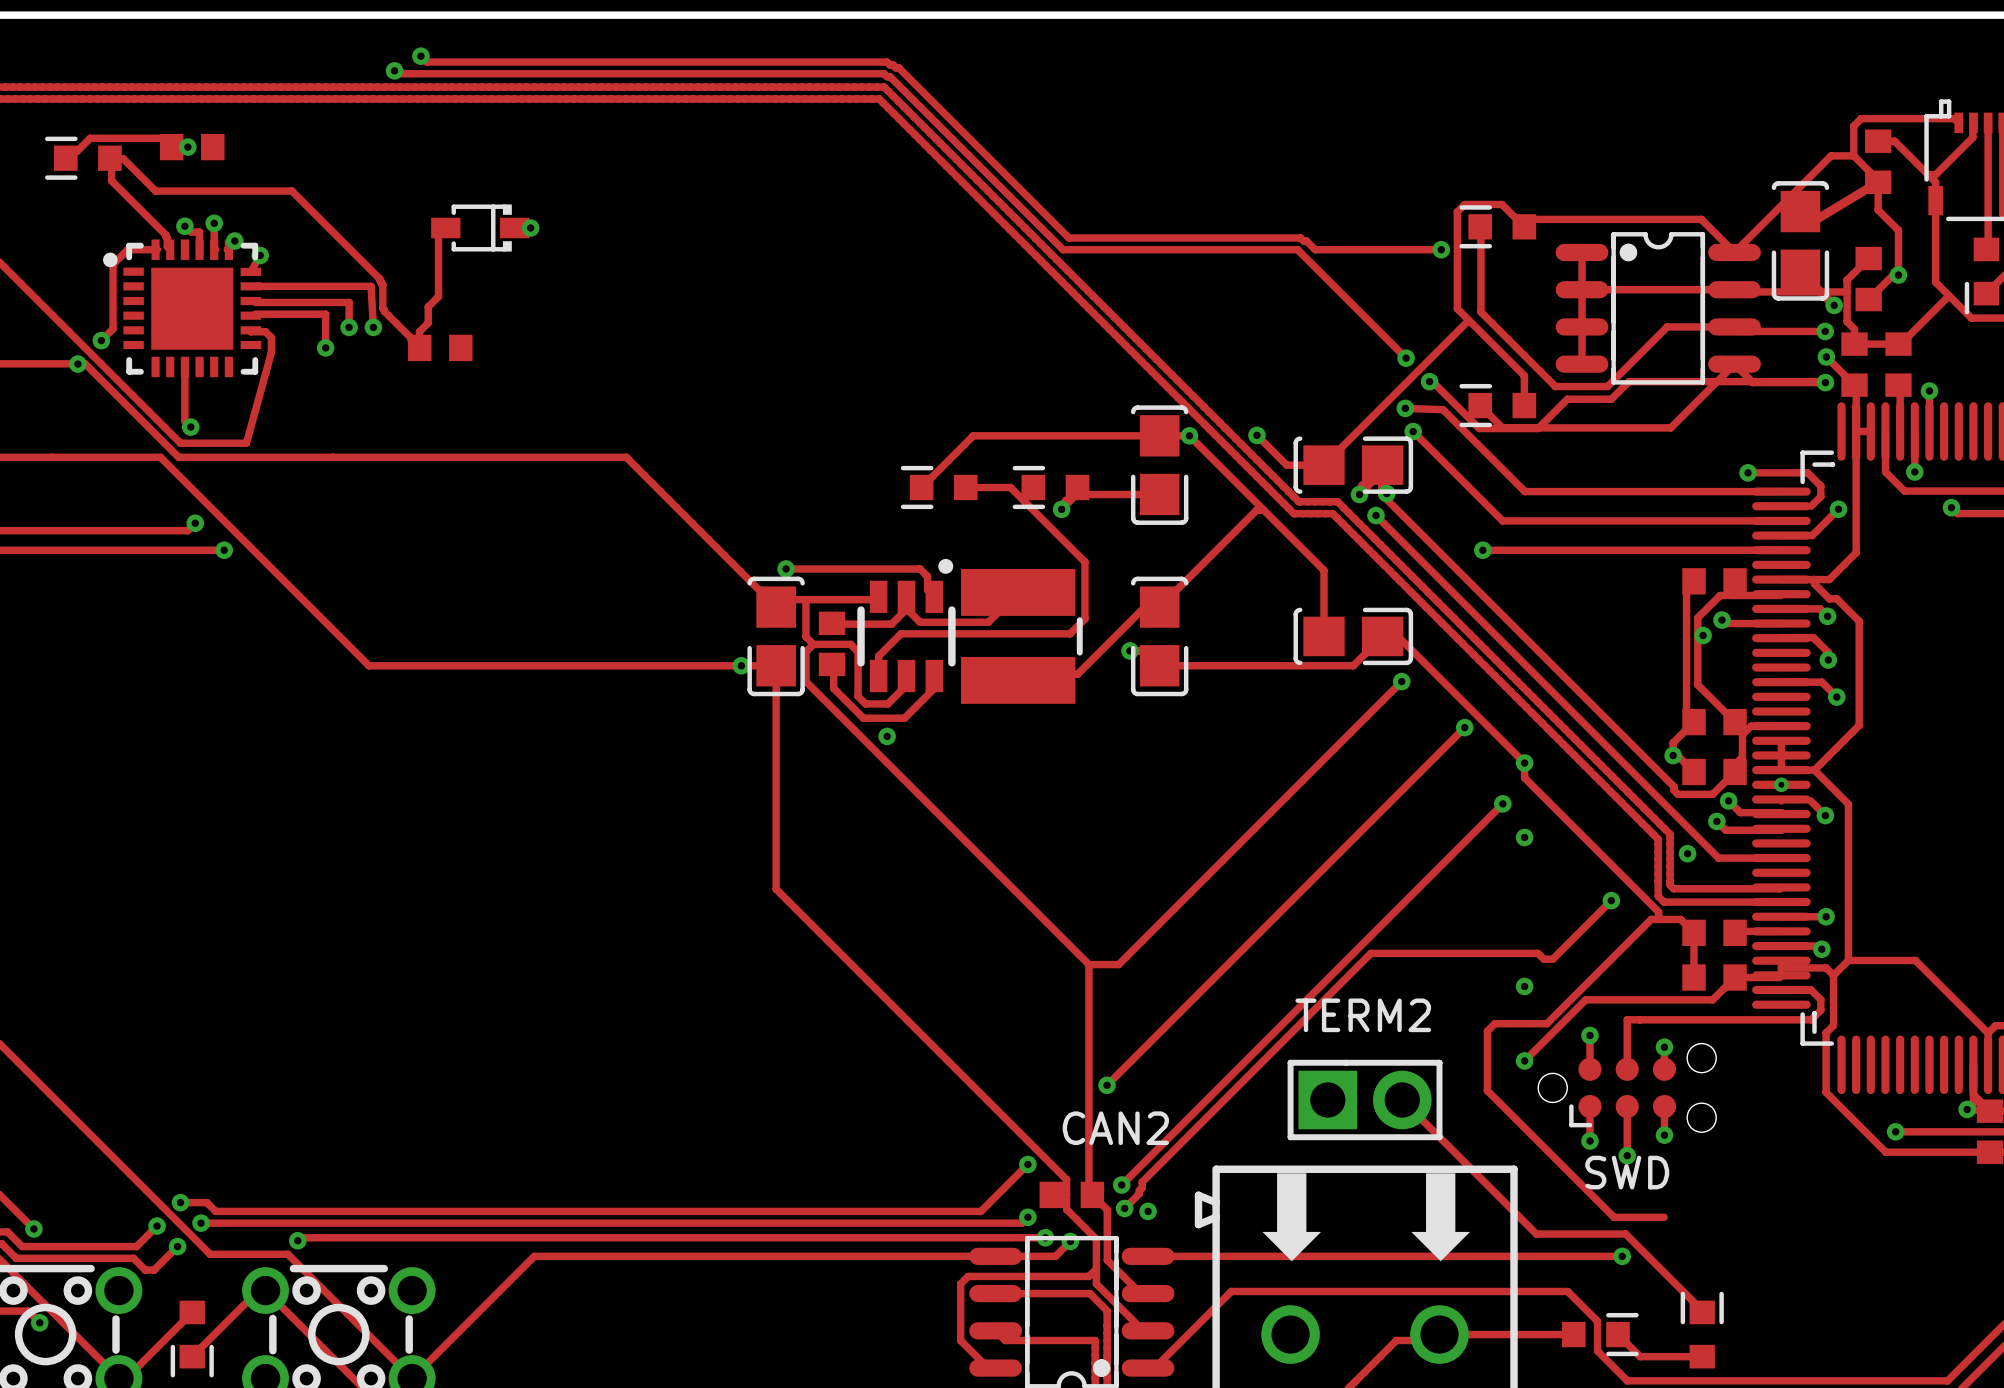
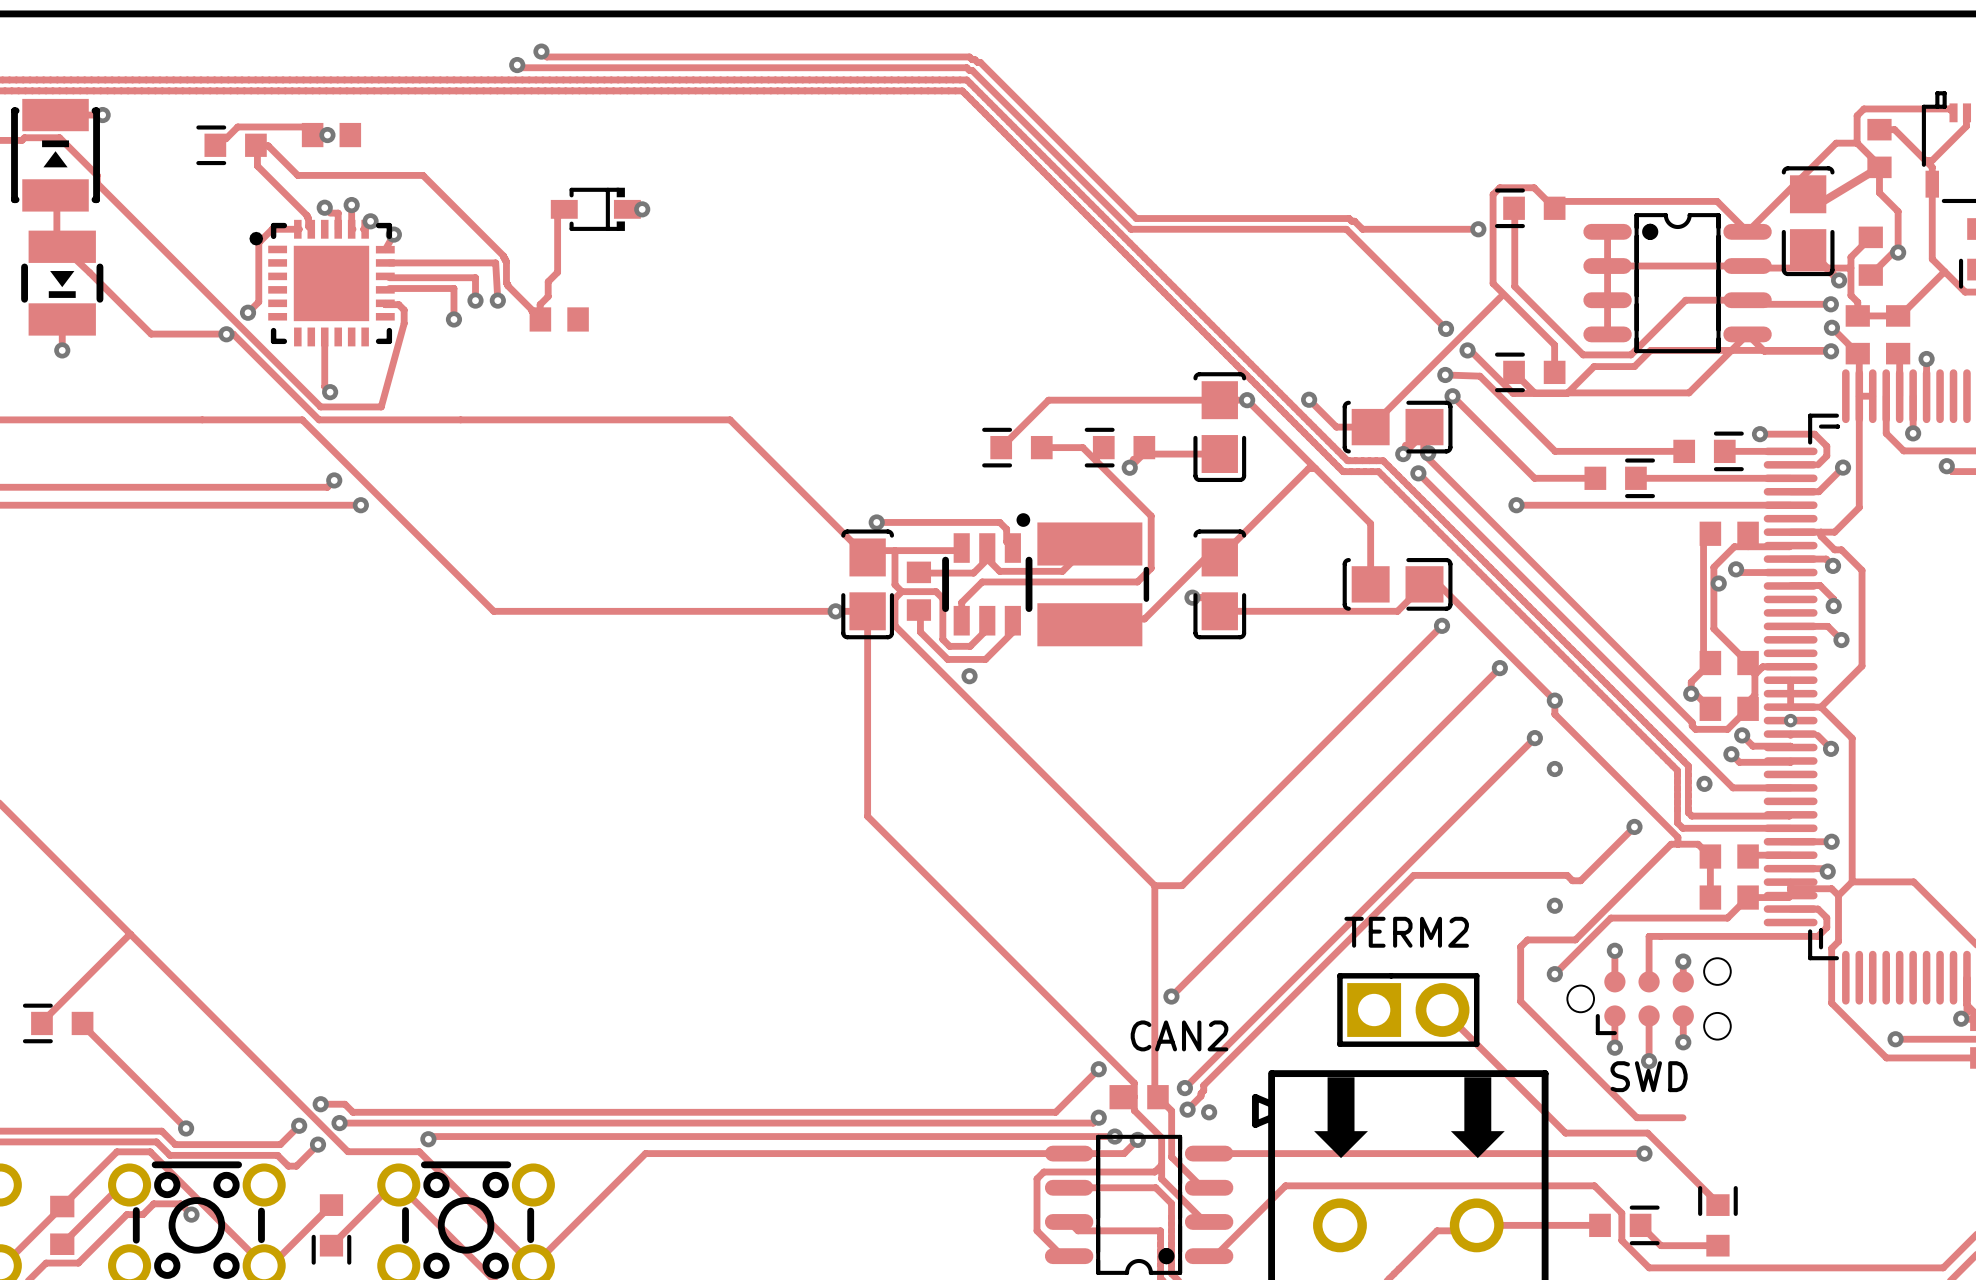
track: (1665, 491) (1709, 491) -> none
part: none -> (1708, 451)
track: (1568, 520) (1612, 520) -> none
part: none -> (1619, 478)

